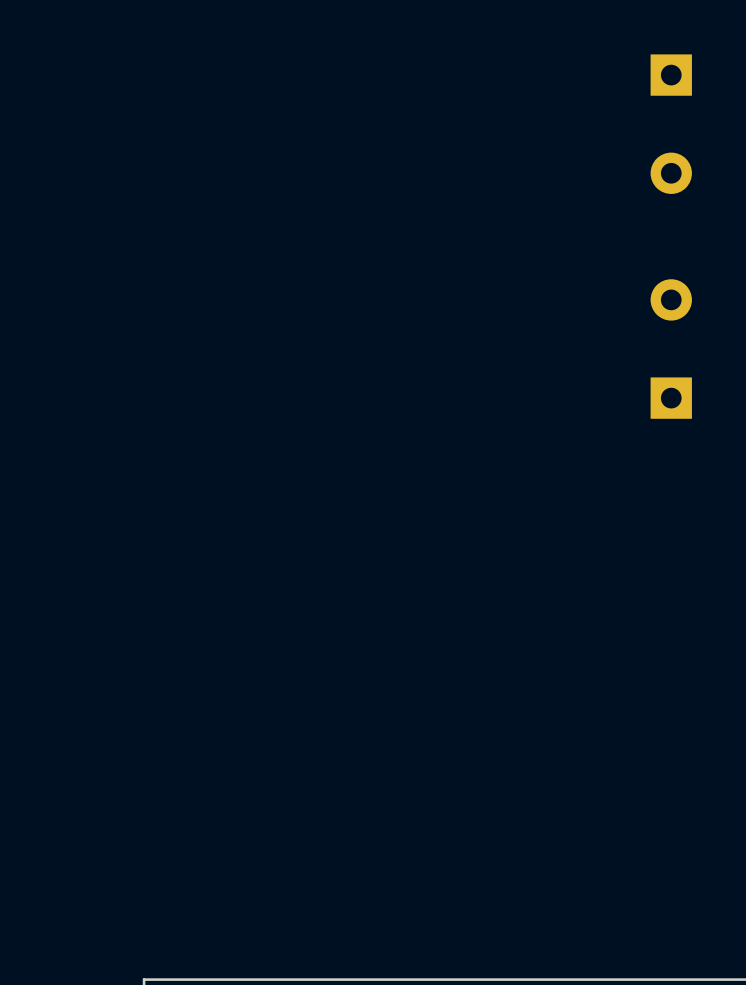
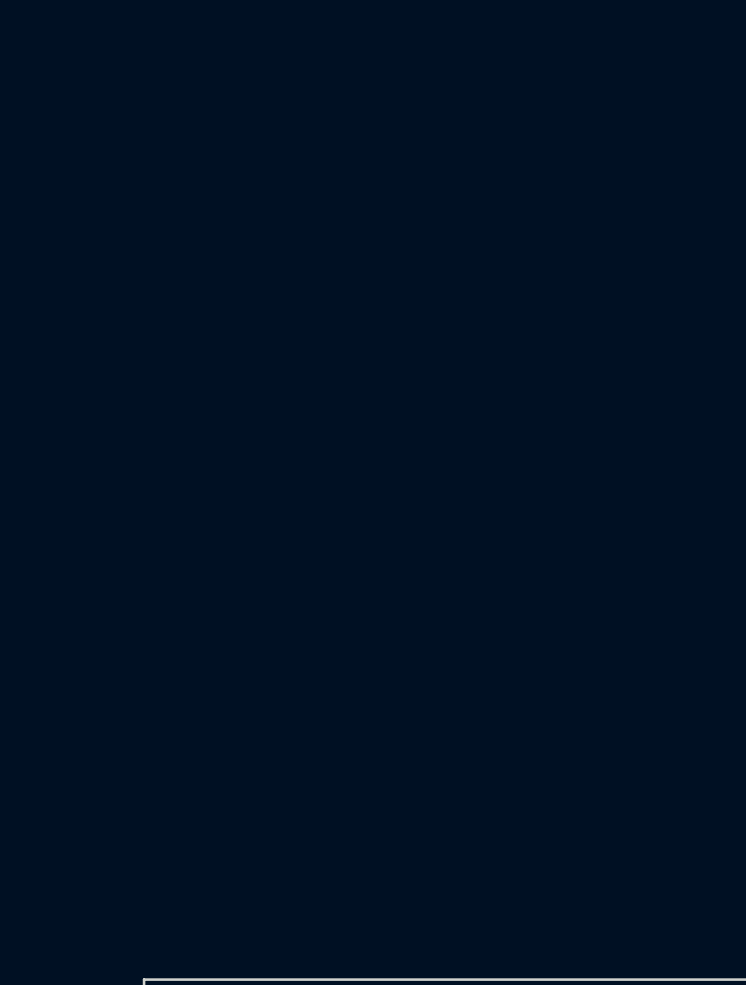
part: (671, 124) -> none
part: (671, 349) -> none

